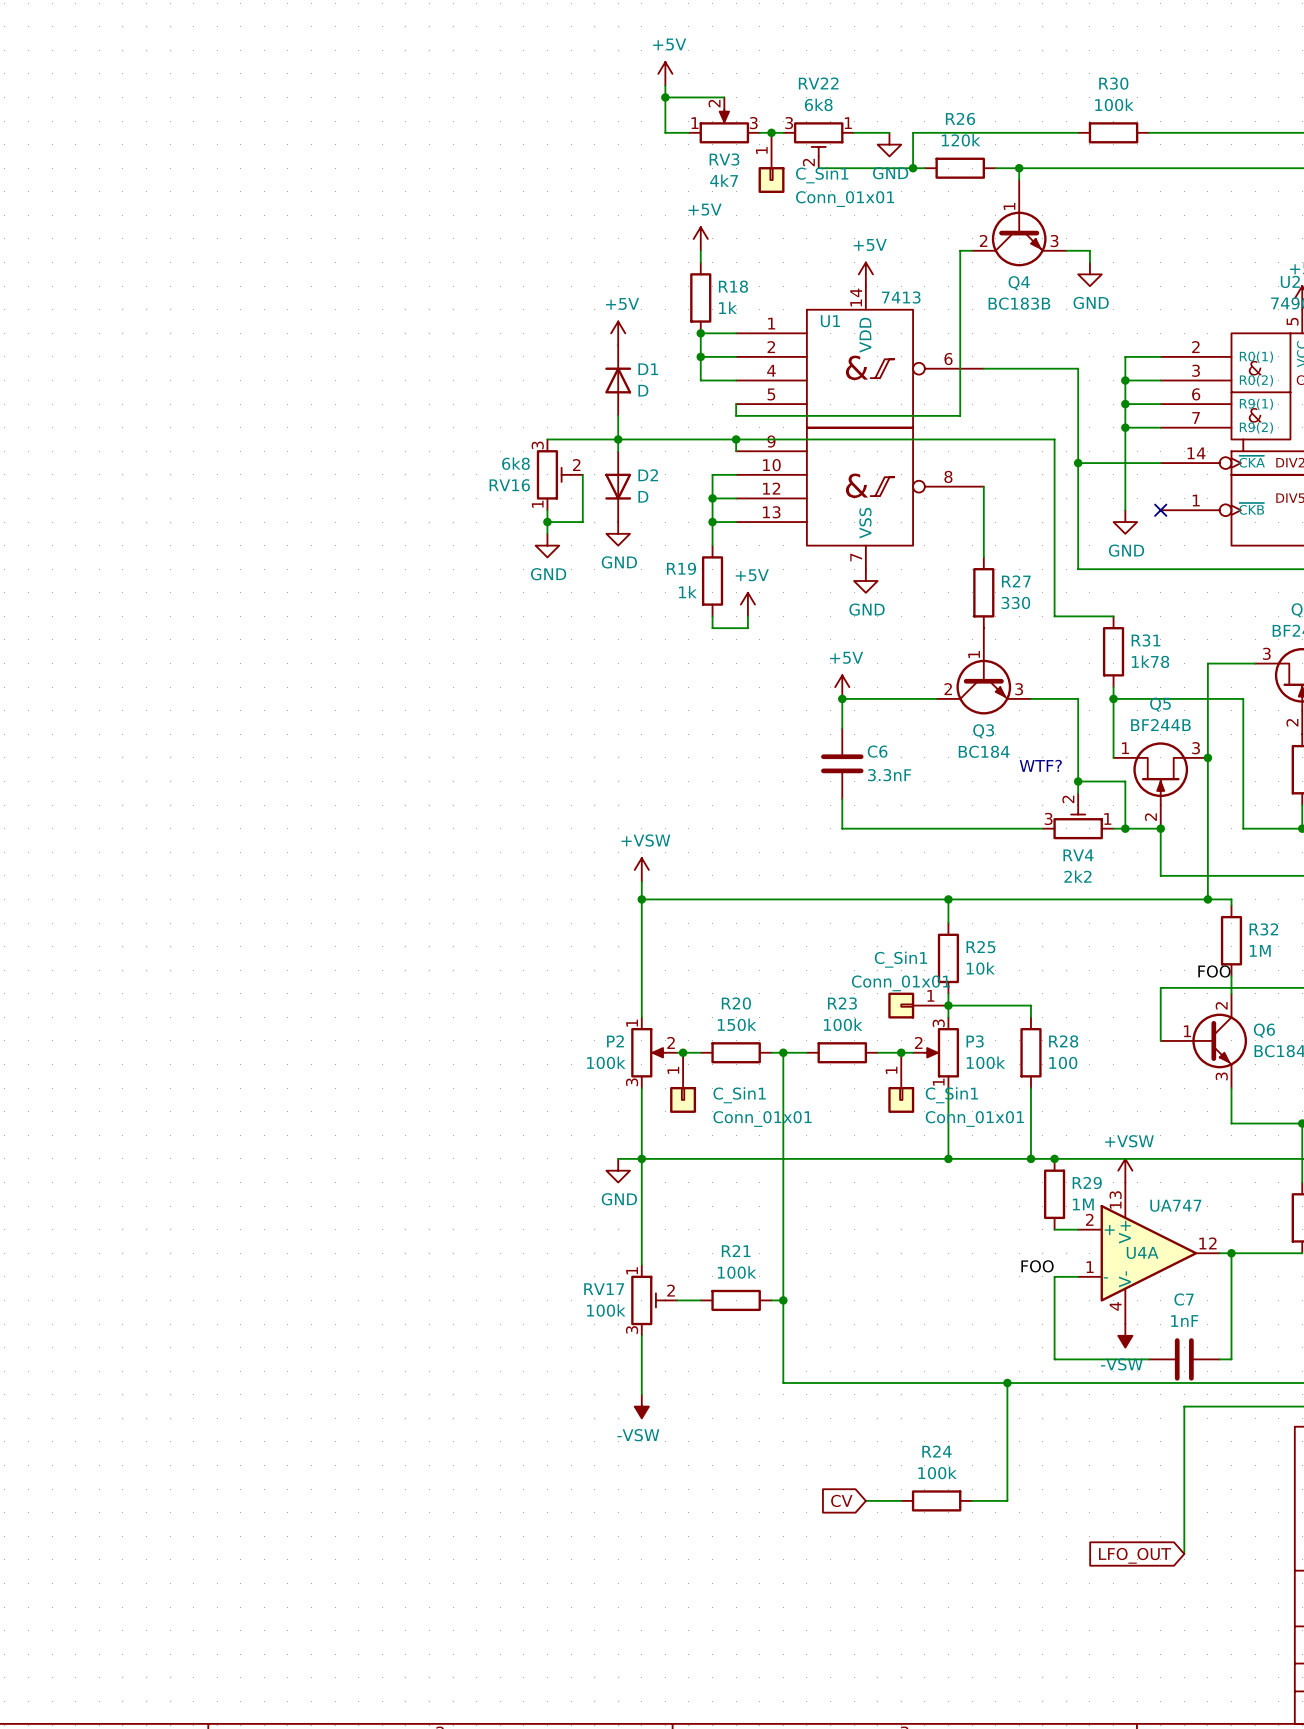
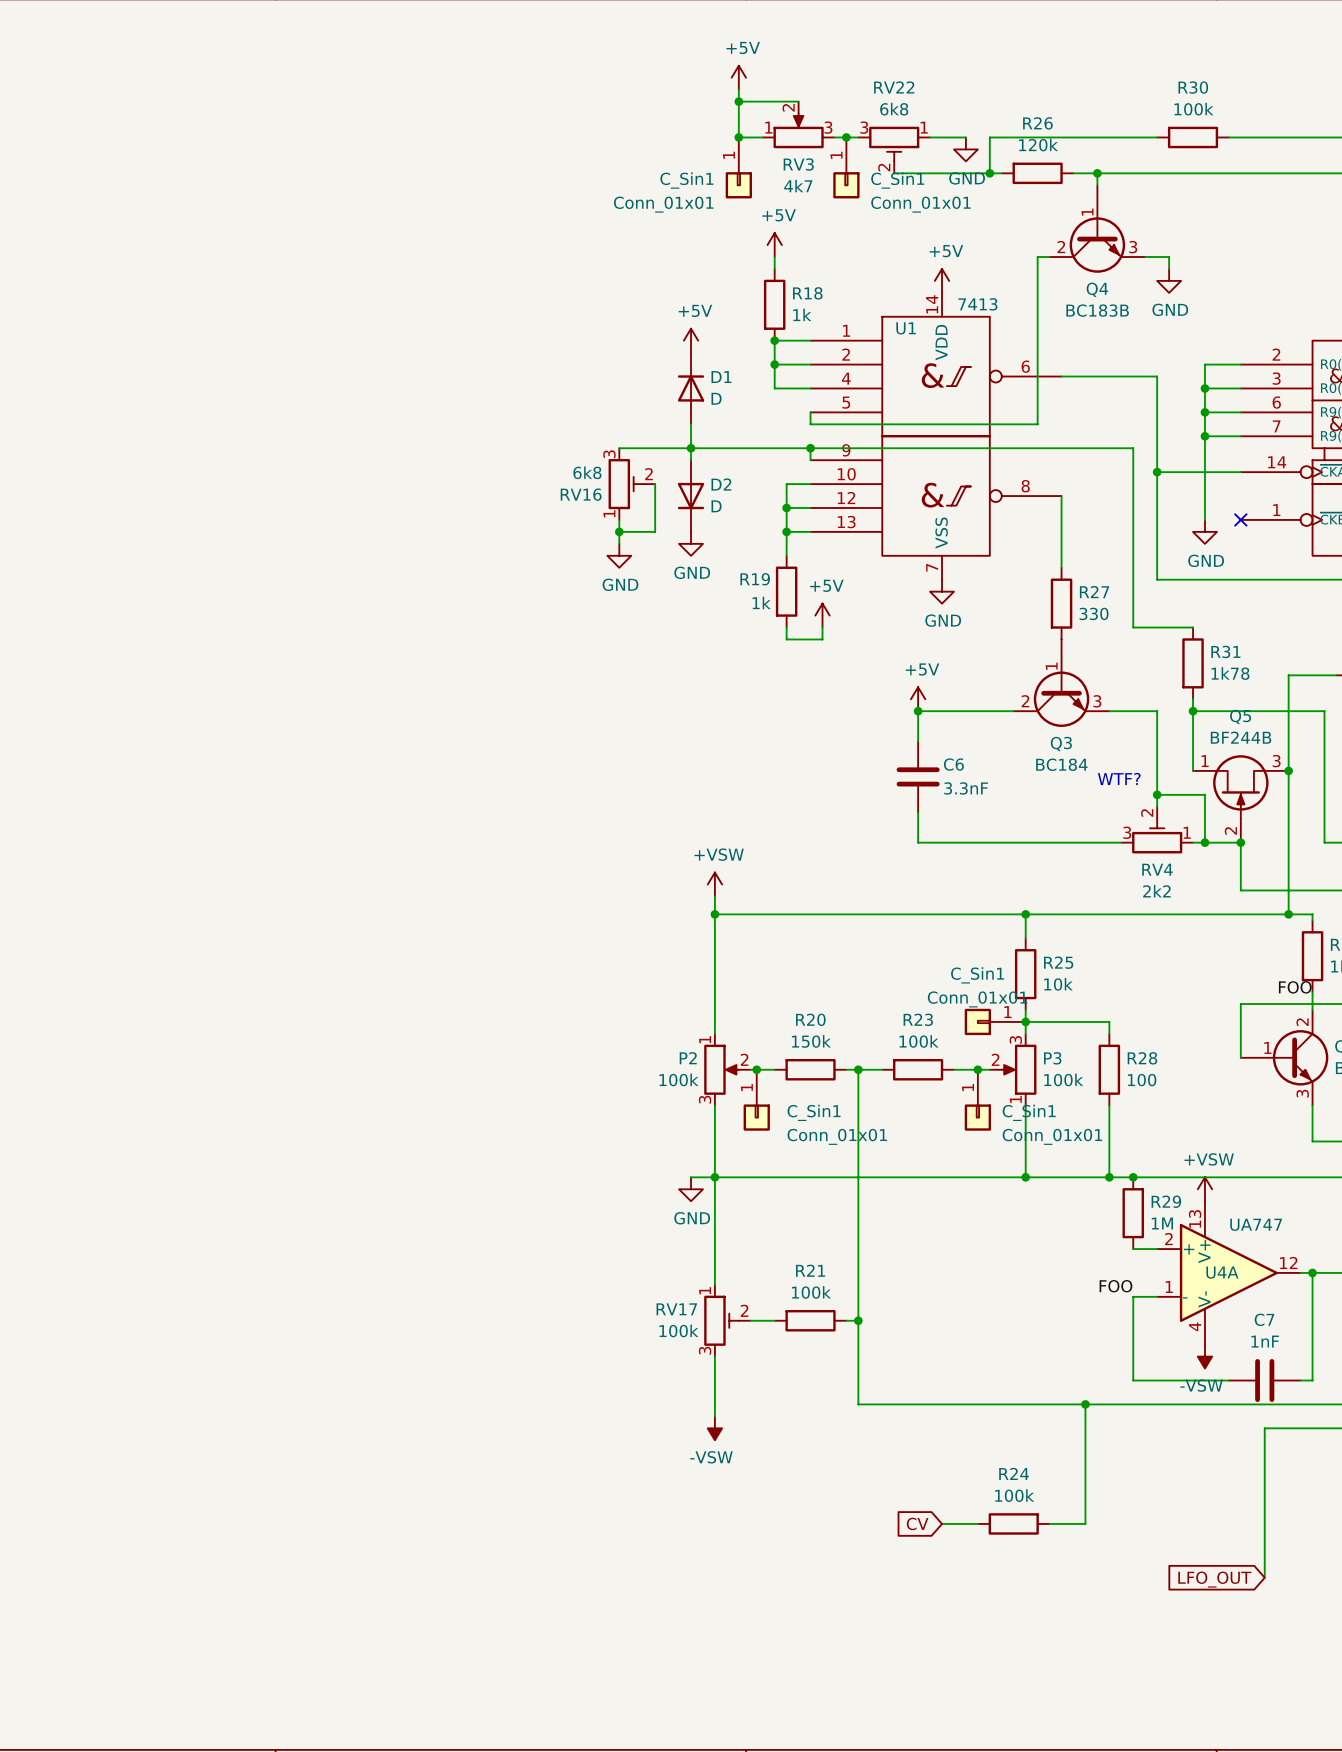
junction: none -> (738, 137)
C_Sin1: none -> Conn_01x01 (738, 167)

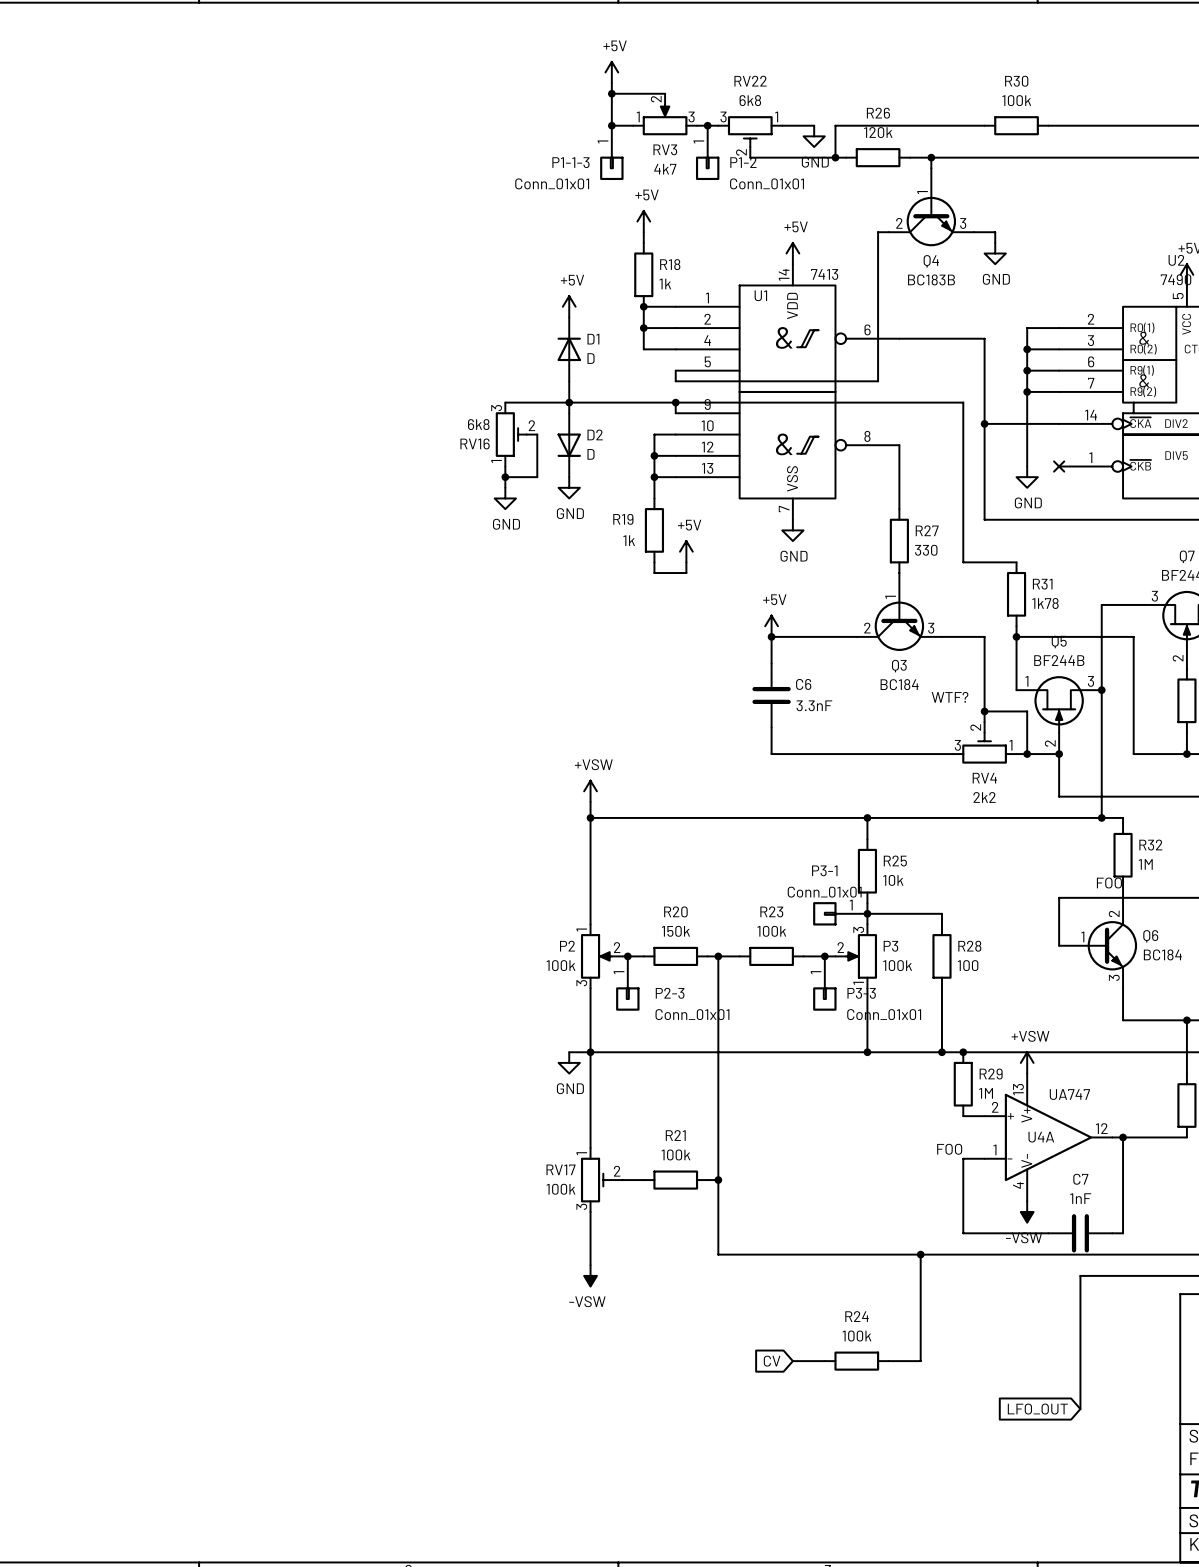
C_Sin1 name: C_Sin1 (686, 180) -> P1-1-3 (570, 162)
C_Sin1 name: C_Sin1 (897, 180) -> P1-2 (743, 162)
C_Sin1 name: C_Sin1 (977, 975) -> P3-1 (824, 870)
C_Sin1 name: C_Sin1 (814, 1112) -> P2-3 (670, 993)
C_Sin1 name: C_Sin1 (1029, 1112) -> P3-3 (861, 993)

